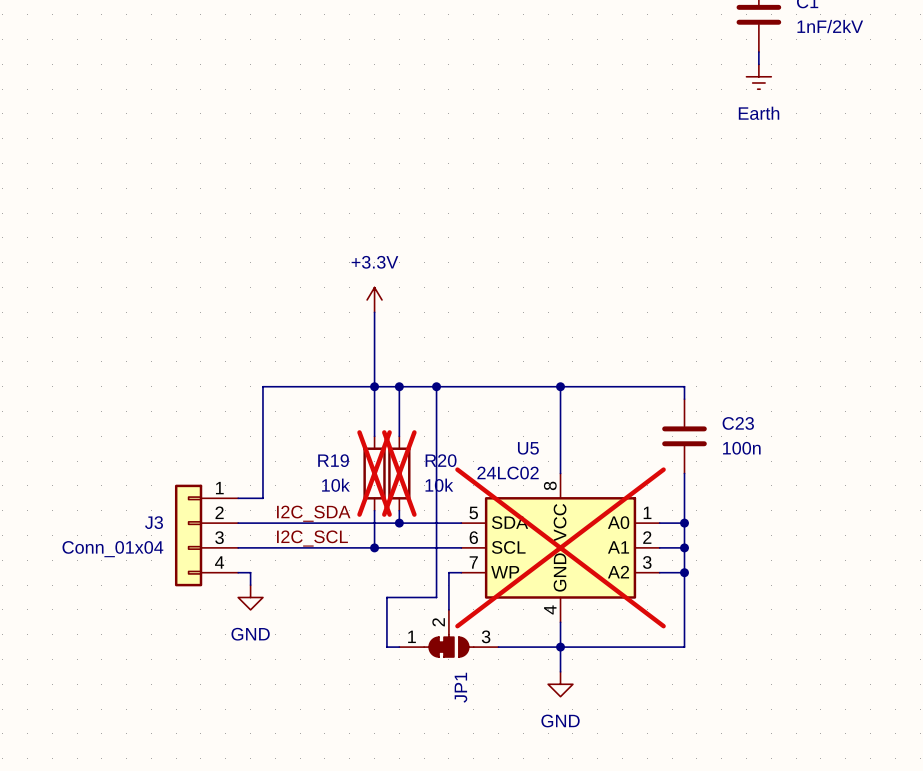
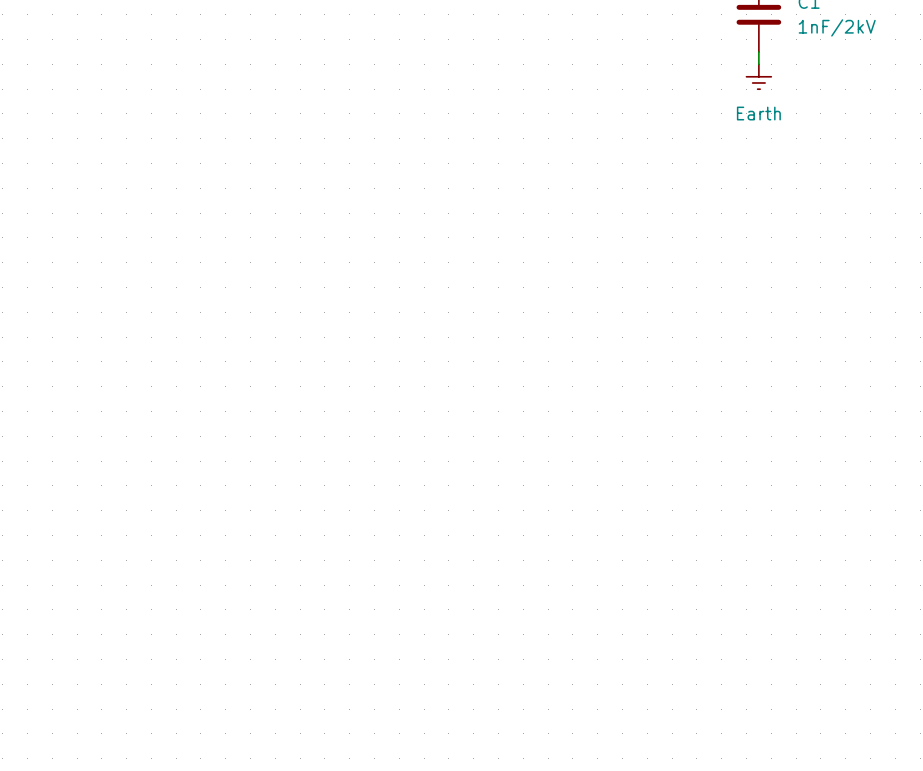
power symbol: +3.3V (374, 299) -> none
wire: (374, 312) (374, 436) -> none
junction: (374, 386) -> none
wire: (399, 386) (399, 436) -> none
junction: (399, 386) -> none
wire: (436, 386) (436, 597) (386, 597) (386, 647) (399, 647) -> none
junction: (436, 386) -> none
wire: (560, 386) (560, 473) -> none
junction: (560, 386) -> none
wire: (684, 399) (684, 386) (262, 386) (262, 498) (238, 498) -> none
C23: 100n (684, 436) -> none
R19: 10k (374, 473) -> none
R20: 10k (399, 473) -> none
wire: (684, 473) (684, 647) (498, 647) -> none
wire: (374, 510) (374, 547) -> none
wire: (399, 510) (399, 523) -> none
label: I2C_SDA (313, 513) -> none
wire: (238, 523) (461, 523) -> none
junction: (399, 523) -> none
wire: (659, 523) (684, 523) -> none
junction: (684, 523) -> none
J3: Conn_01x04 (206, 535) -> none
label: I2C_SCL (312, 538) -> none
wire: (238, 547) (461, 547) -> none
junction: (374, 547) -> none
U5: 24LC02 (560, 547) -> none
wire: (659, 547) (684, 547) -> none
junction: (684, 547) -> none
wire: (238, 572) (250, 572) (250, 585) -> none
wire: (461, 572) (448, 572) (448, 609) -> none
wire: (659, 572) (684, 572) -> none
junction: (684, 572) -> none
power symbol: GND (250, 597) -> none
wire: (560, 622) (560, 671) -> none
JP1: (448, 633) -> none
junction: (560, 647) -> none
power symbol: GND (560, 684) -> none

